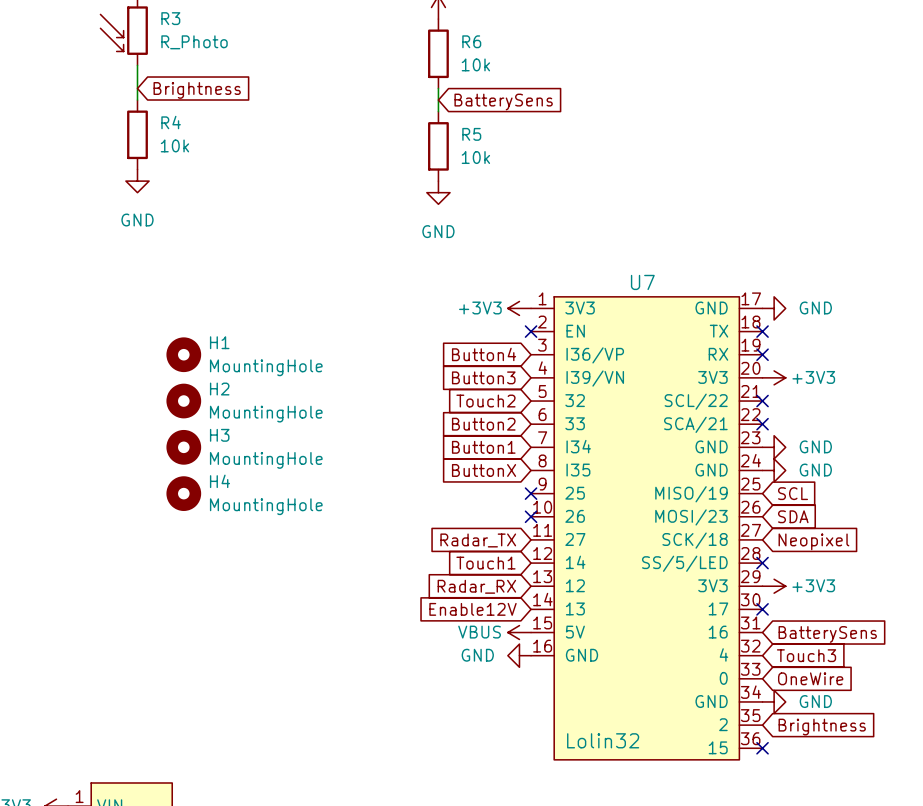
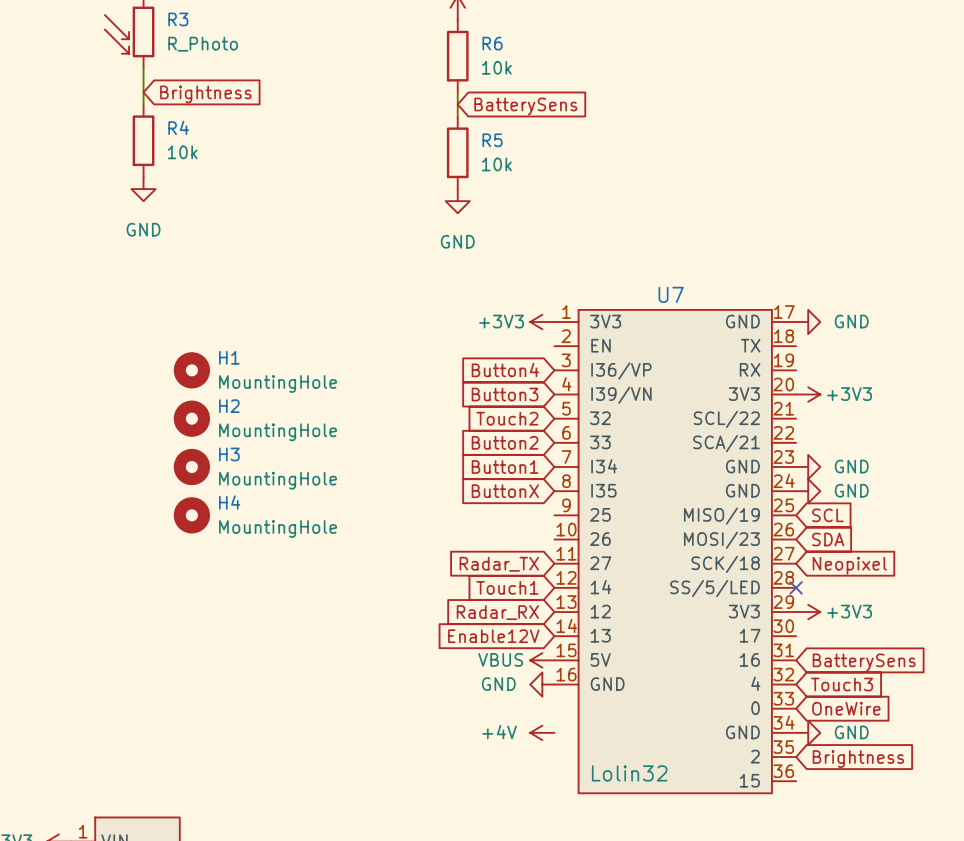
no-connect mark: (531, 331) -> none
no-connect mark: (762, 331) -> none
no-connect mark: (762, 354) -> none
no-connect mark: (762, 401) -> none
no-connect mark: (762, 424) -> none
no-connect mark: (531, 493) -> none
no-connect mark: (531, 516) -> none
no-connect mark: (762, 609) -> none
power symbol: none -> +4V (542, 732)
no-connect mark: (762, 748) -> none

